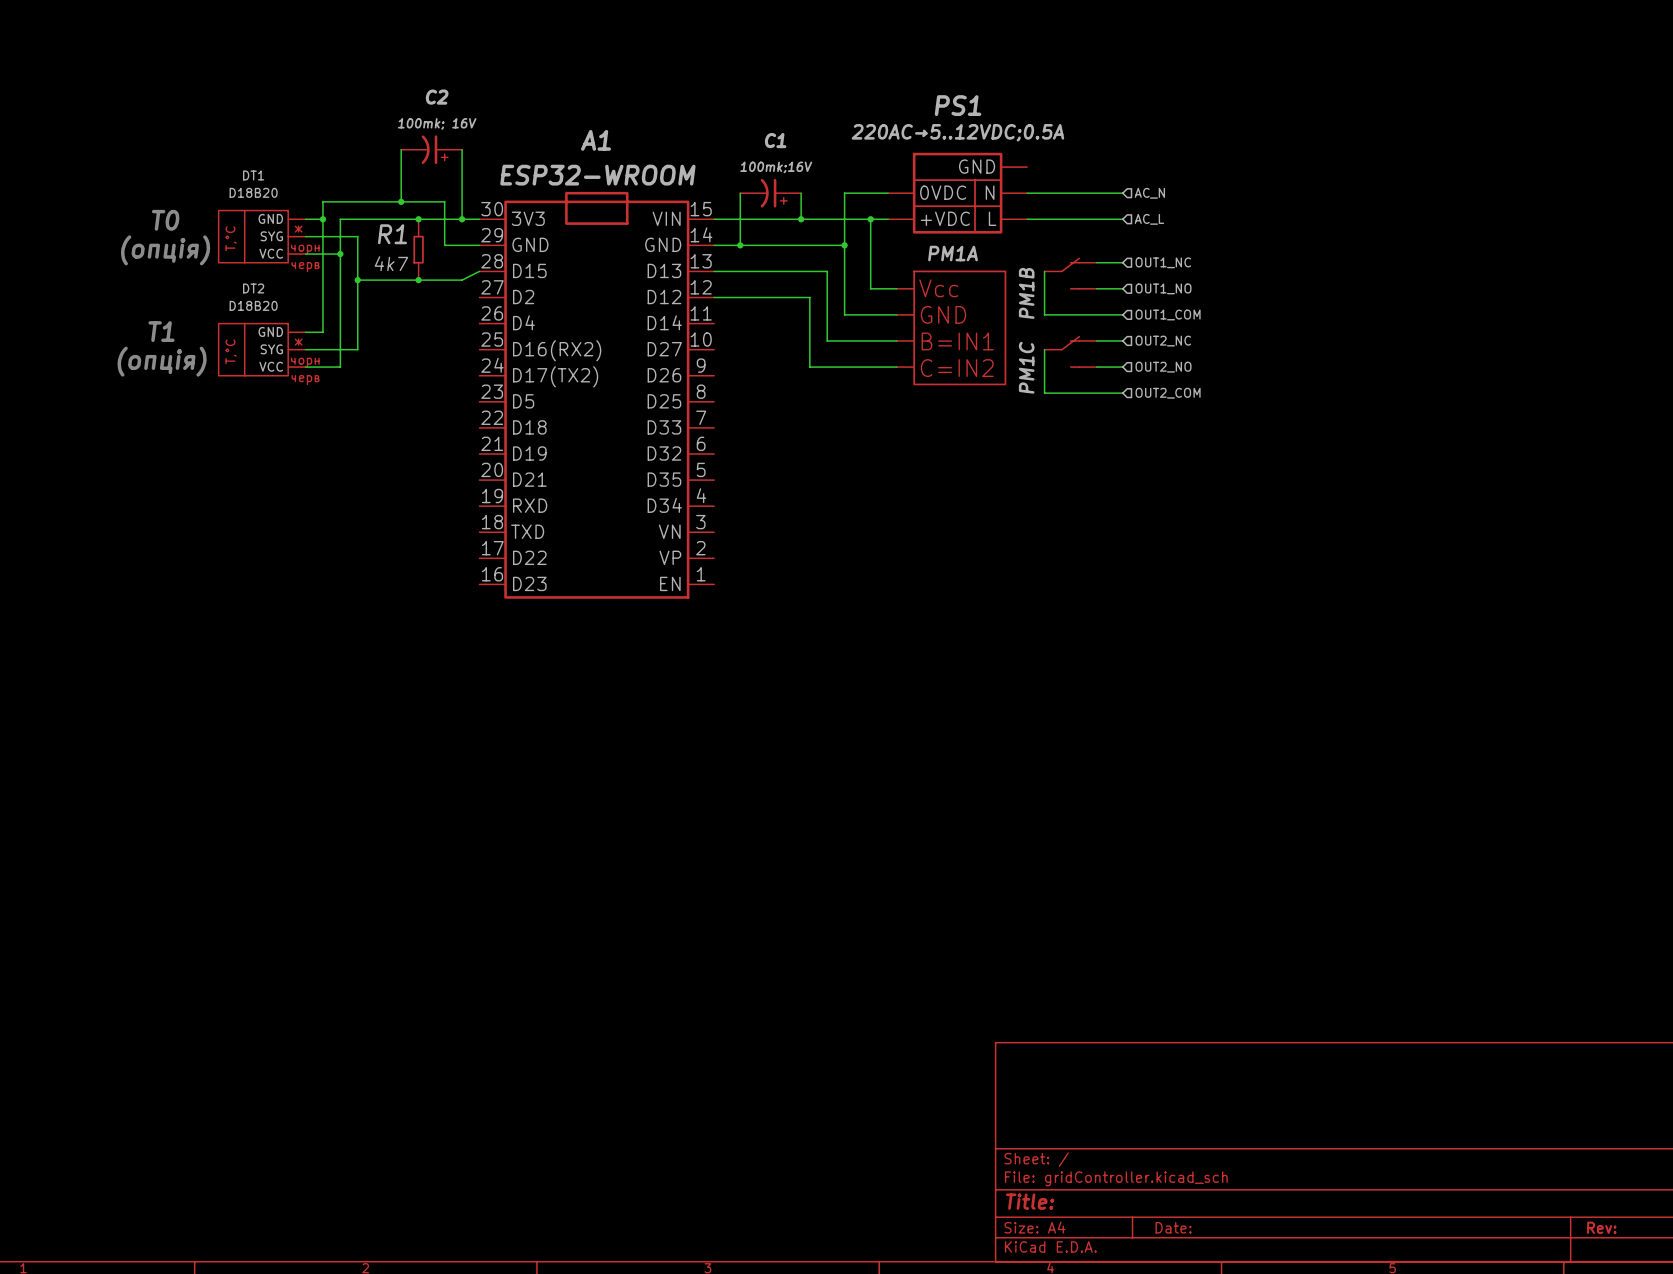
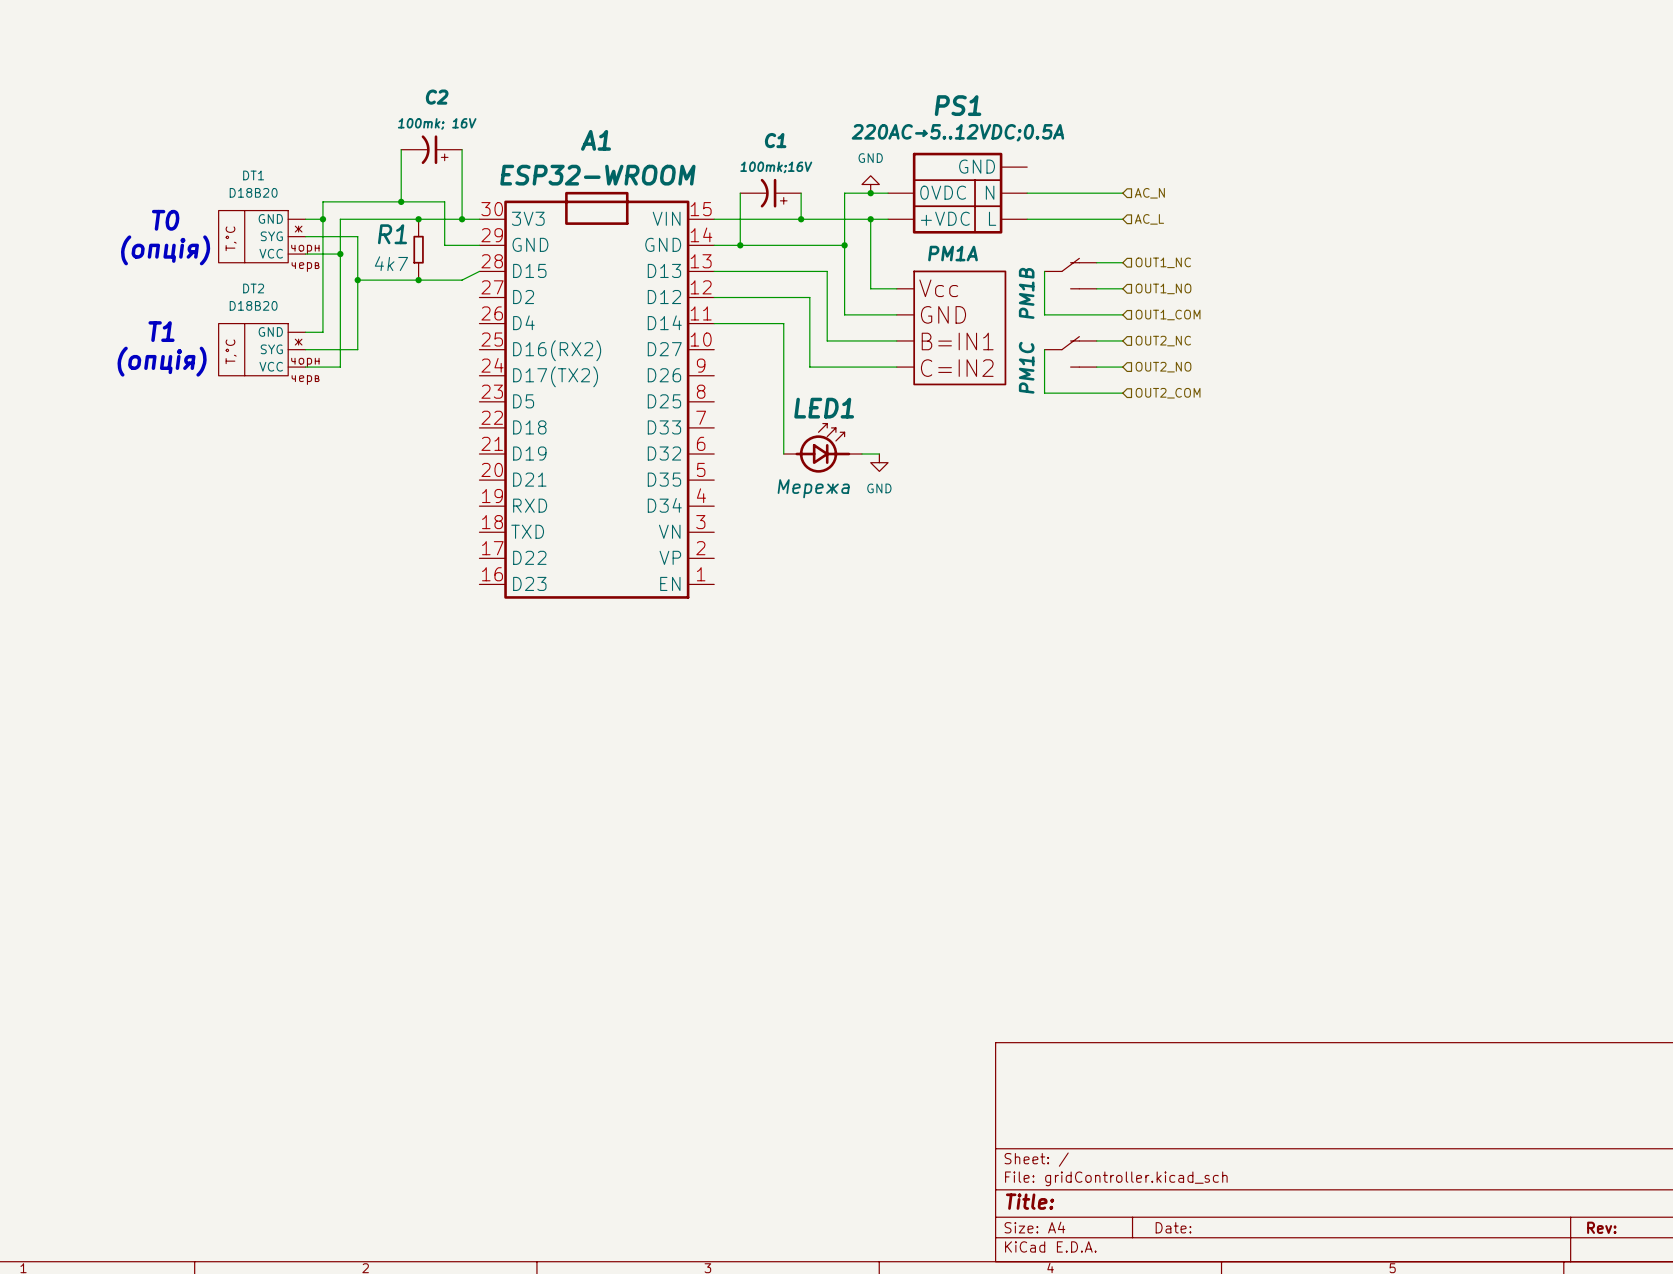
power symbol: none -> GND (870, 184)
junction: none -> (870, 193)
wire: none -> (714, 323) (783, 323) (783, 454)
LED1: none -> Мережа (822, 448)
wire: none -> (861, 454) (879, 454)
power symbol: none -> GND (879, 462)

